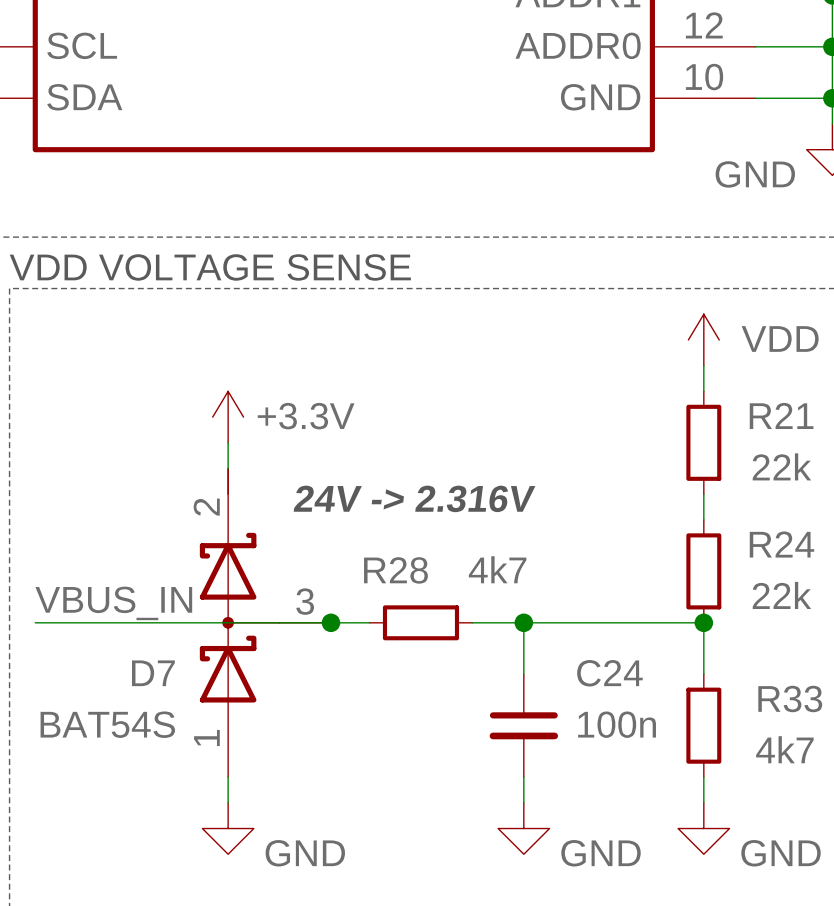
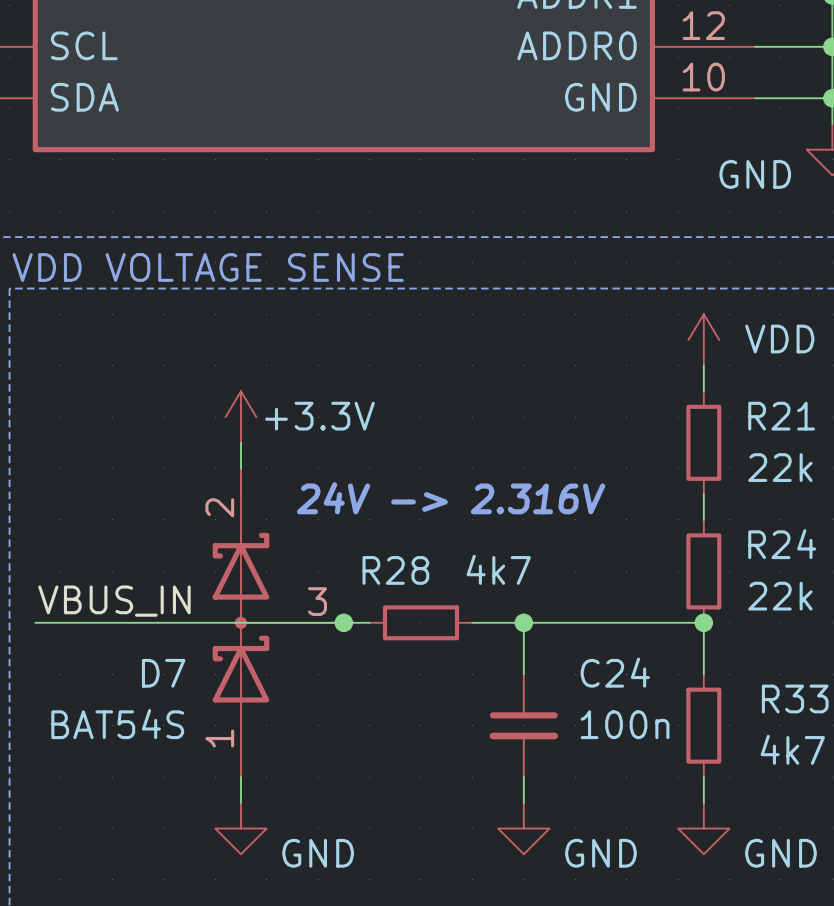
power symbol position: +3.3V (228, 417) -> +3.3V (240, 417)
wire: (228, 442) (228, 468) -> (240, 442) (240, 468)
D7 position: (265, 622) -> (278, 622)
junction position: (330, 622) -> (343, 622)
wire: (228, 777) (228, 802) -> (240, 777) (240, 802)
power symbol position: GND (228, 828) -> GND (240, 828)

